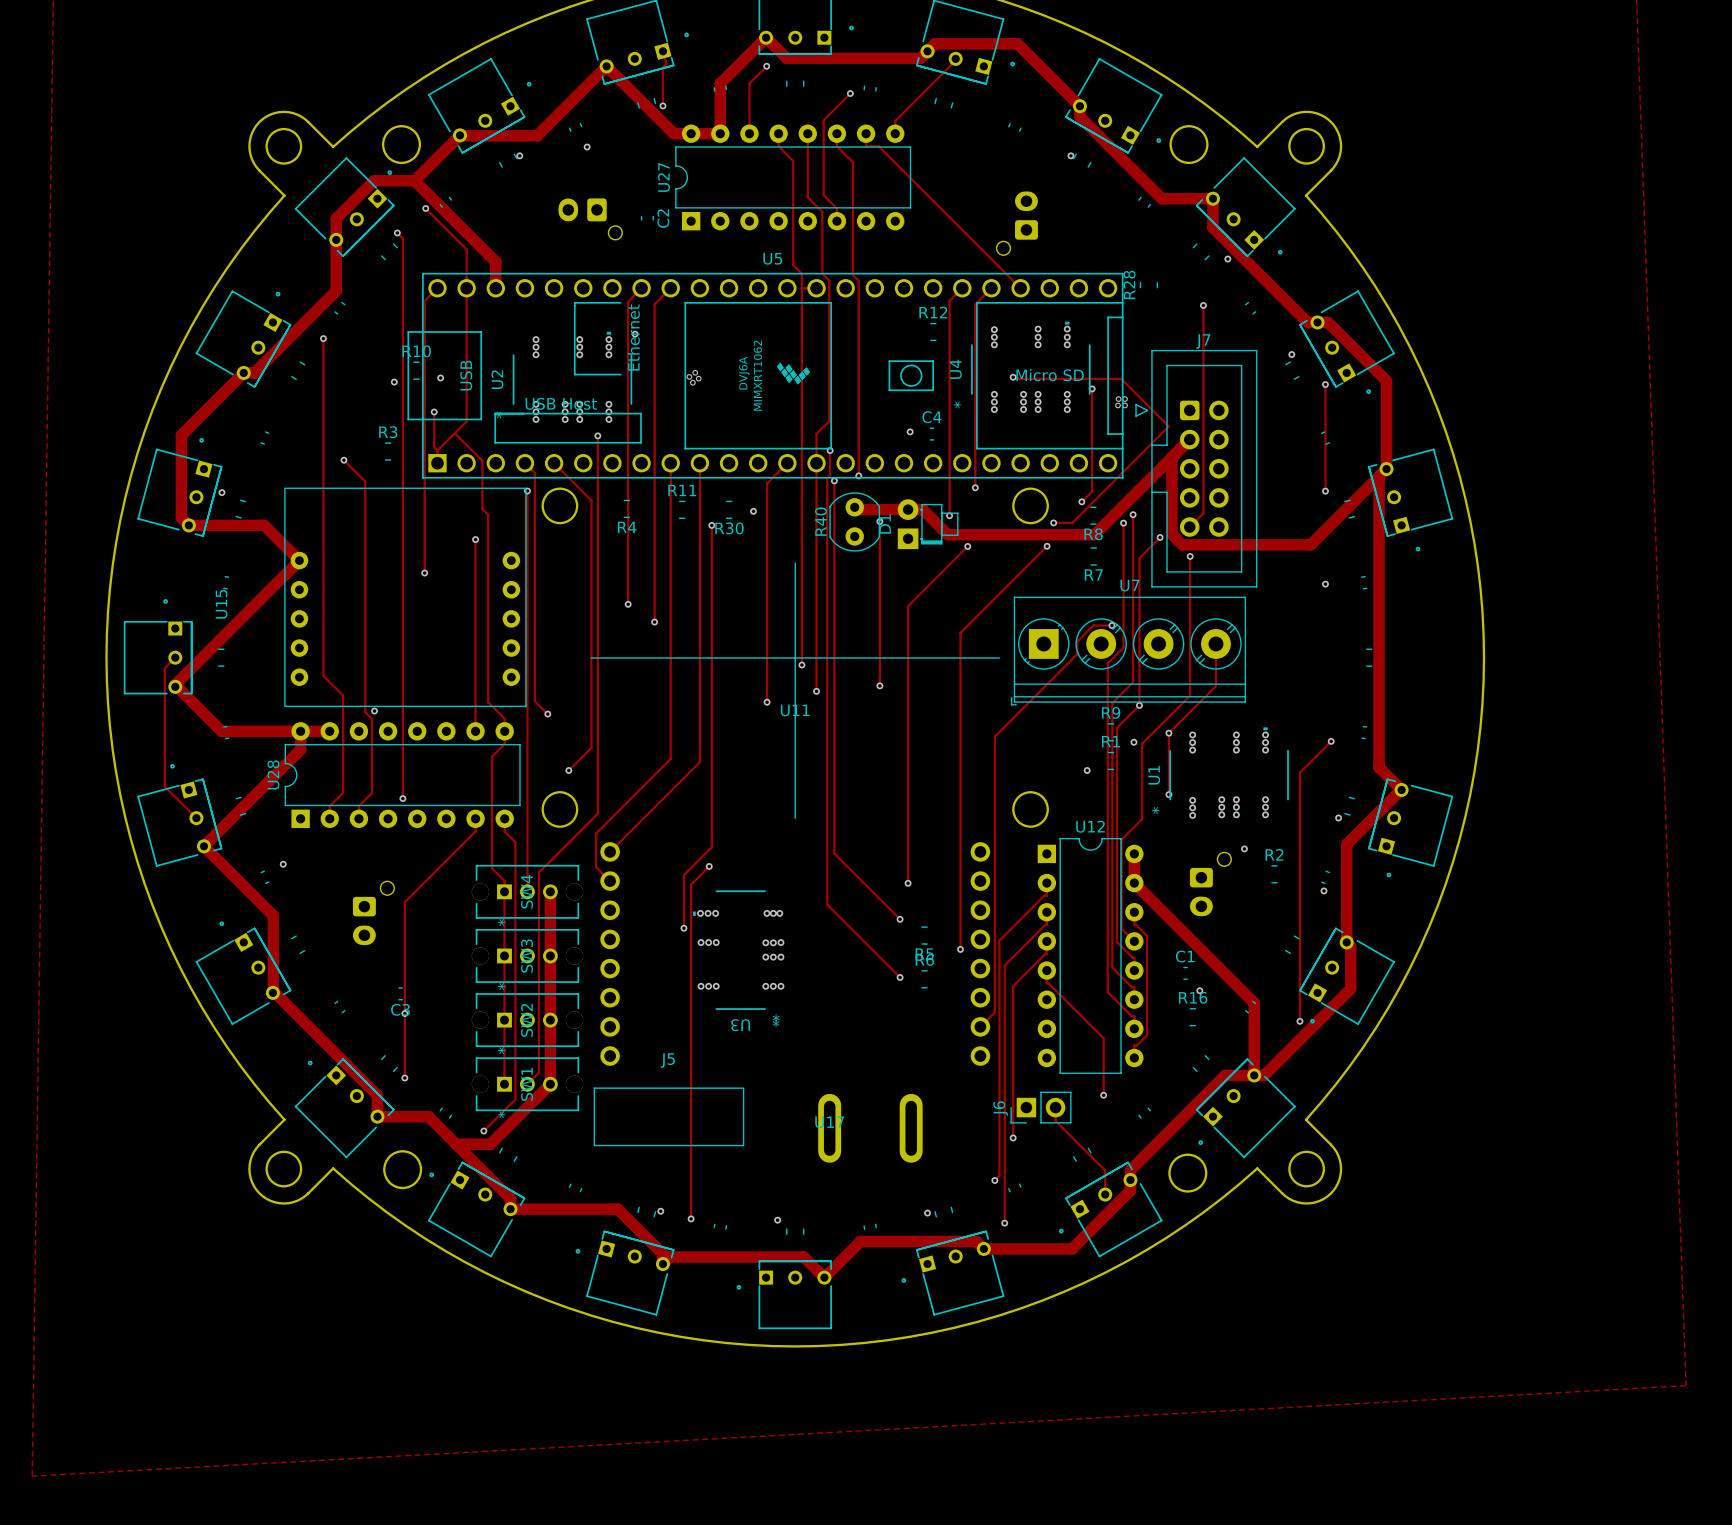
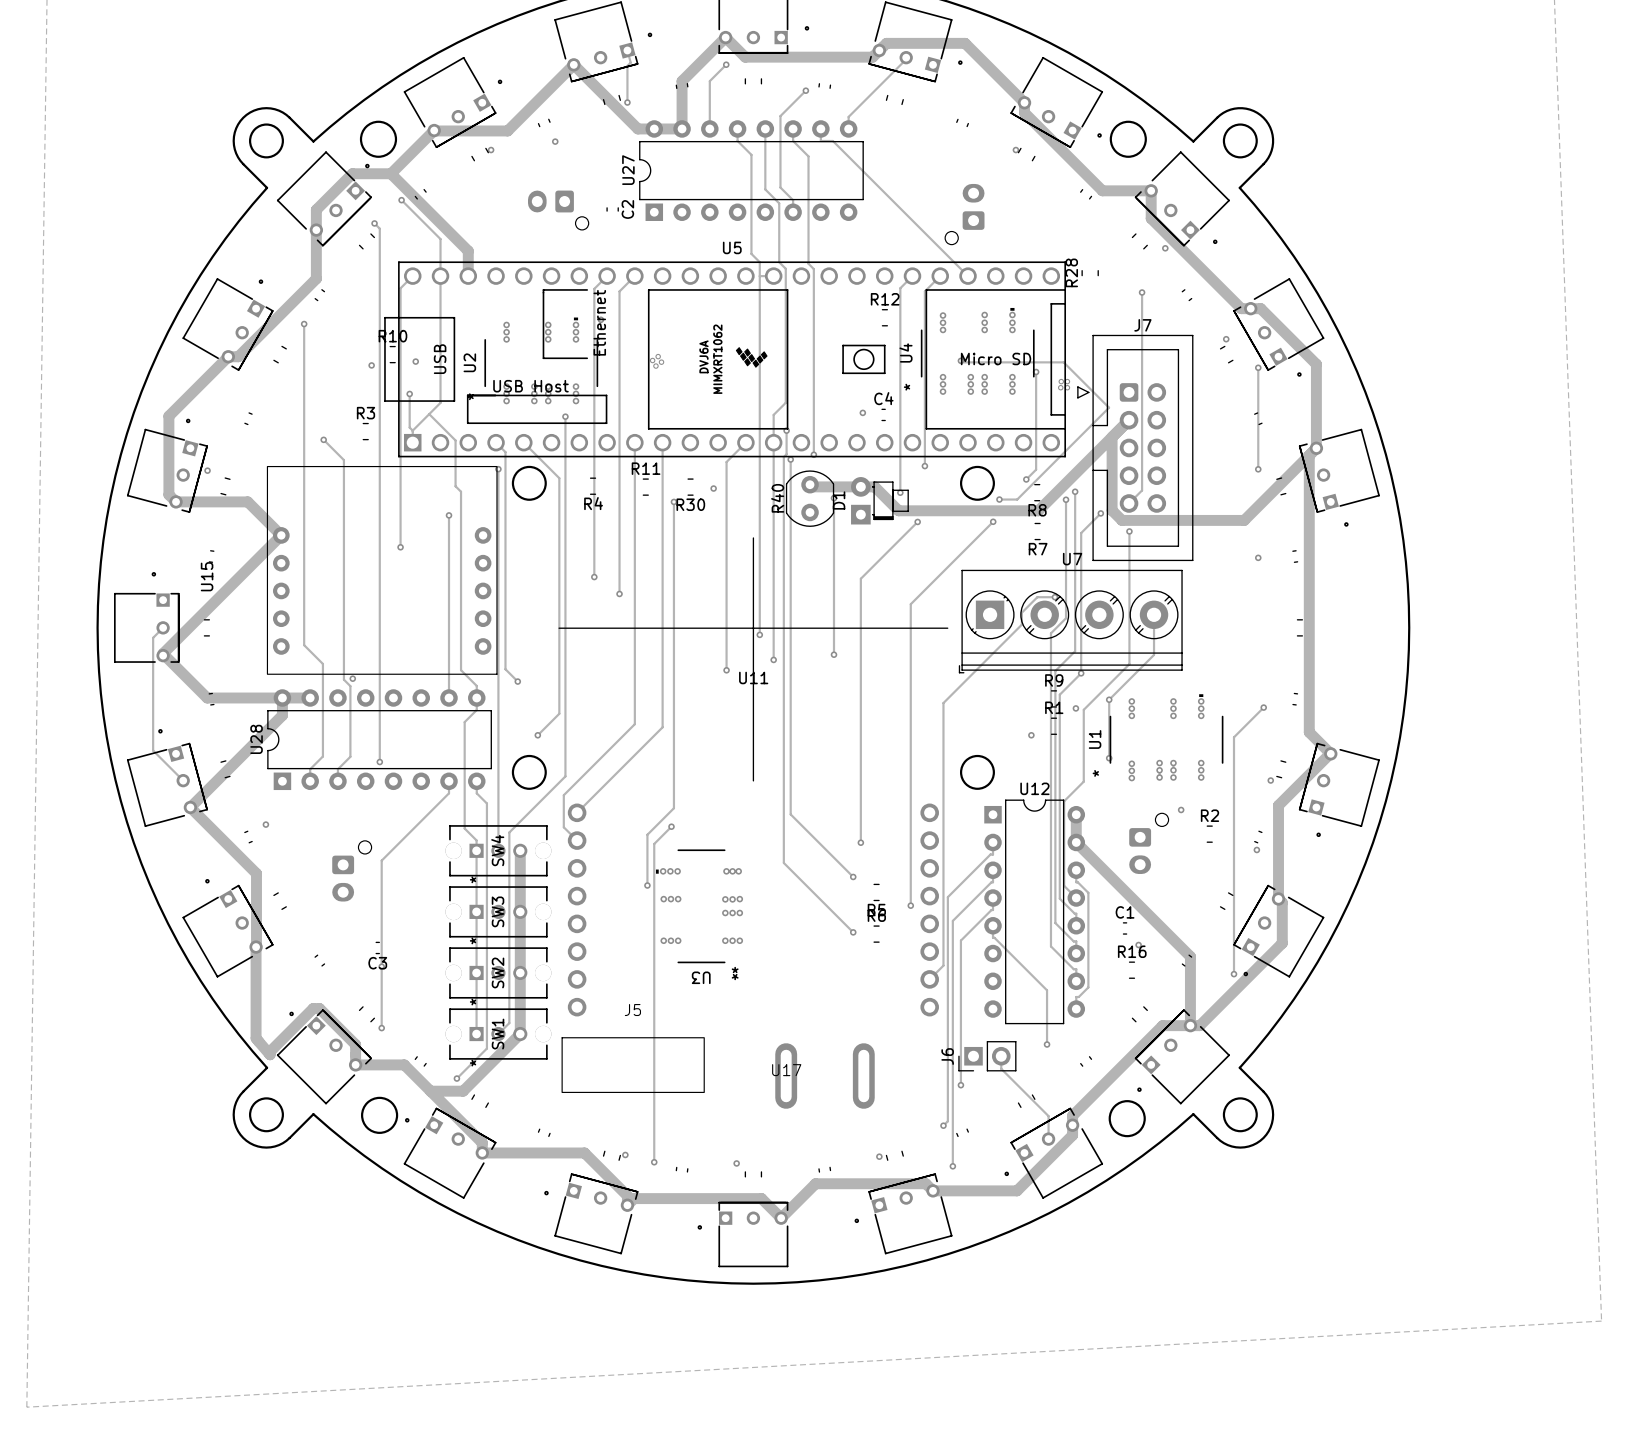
track: (272, 992) (339, 1057) -> (256, 947) (256, 1038) (270, 1054) (270, 1051) (313, 1008) (319, 1008)

